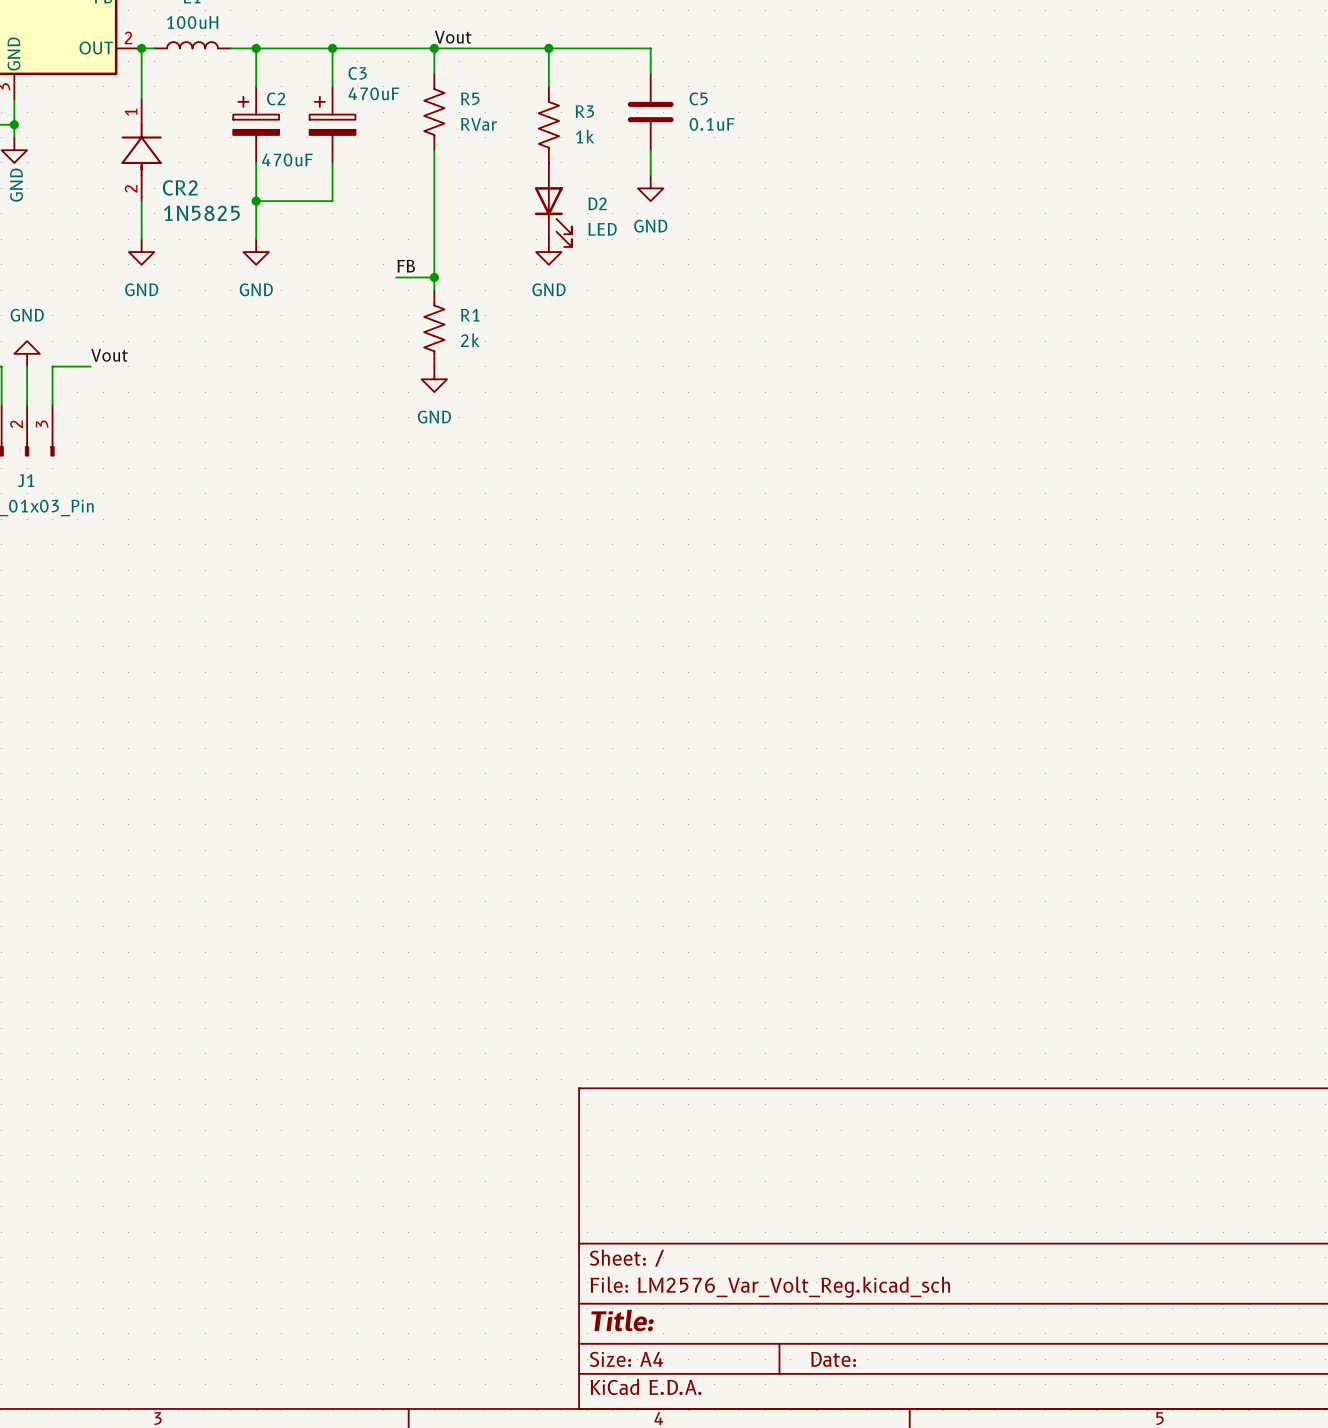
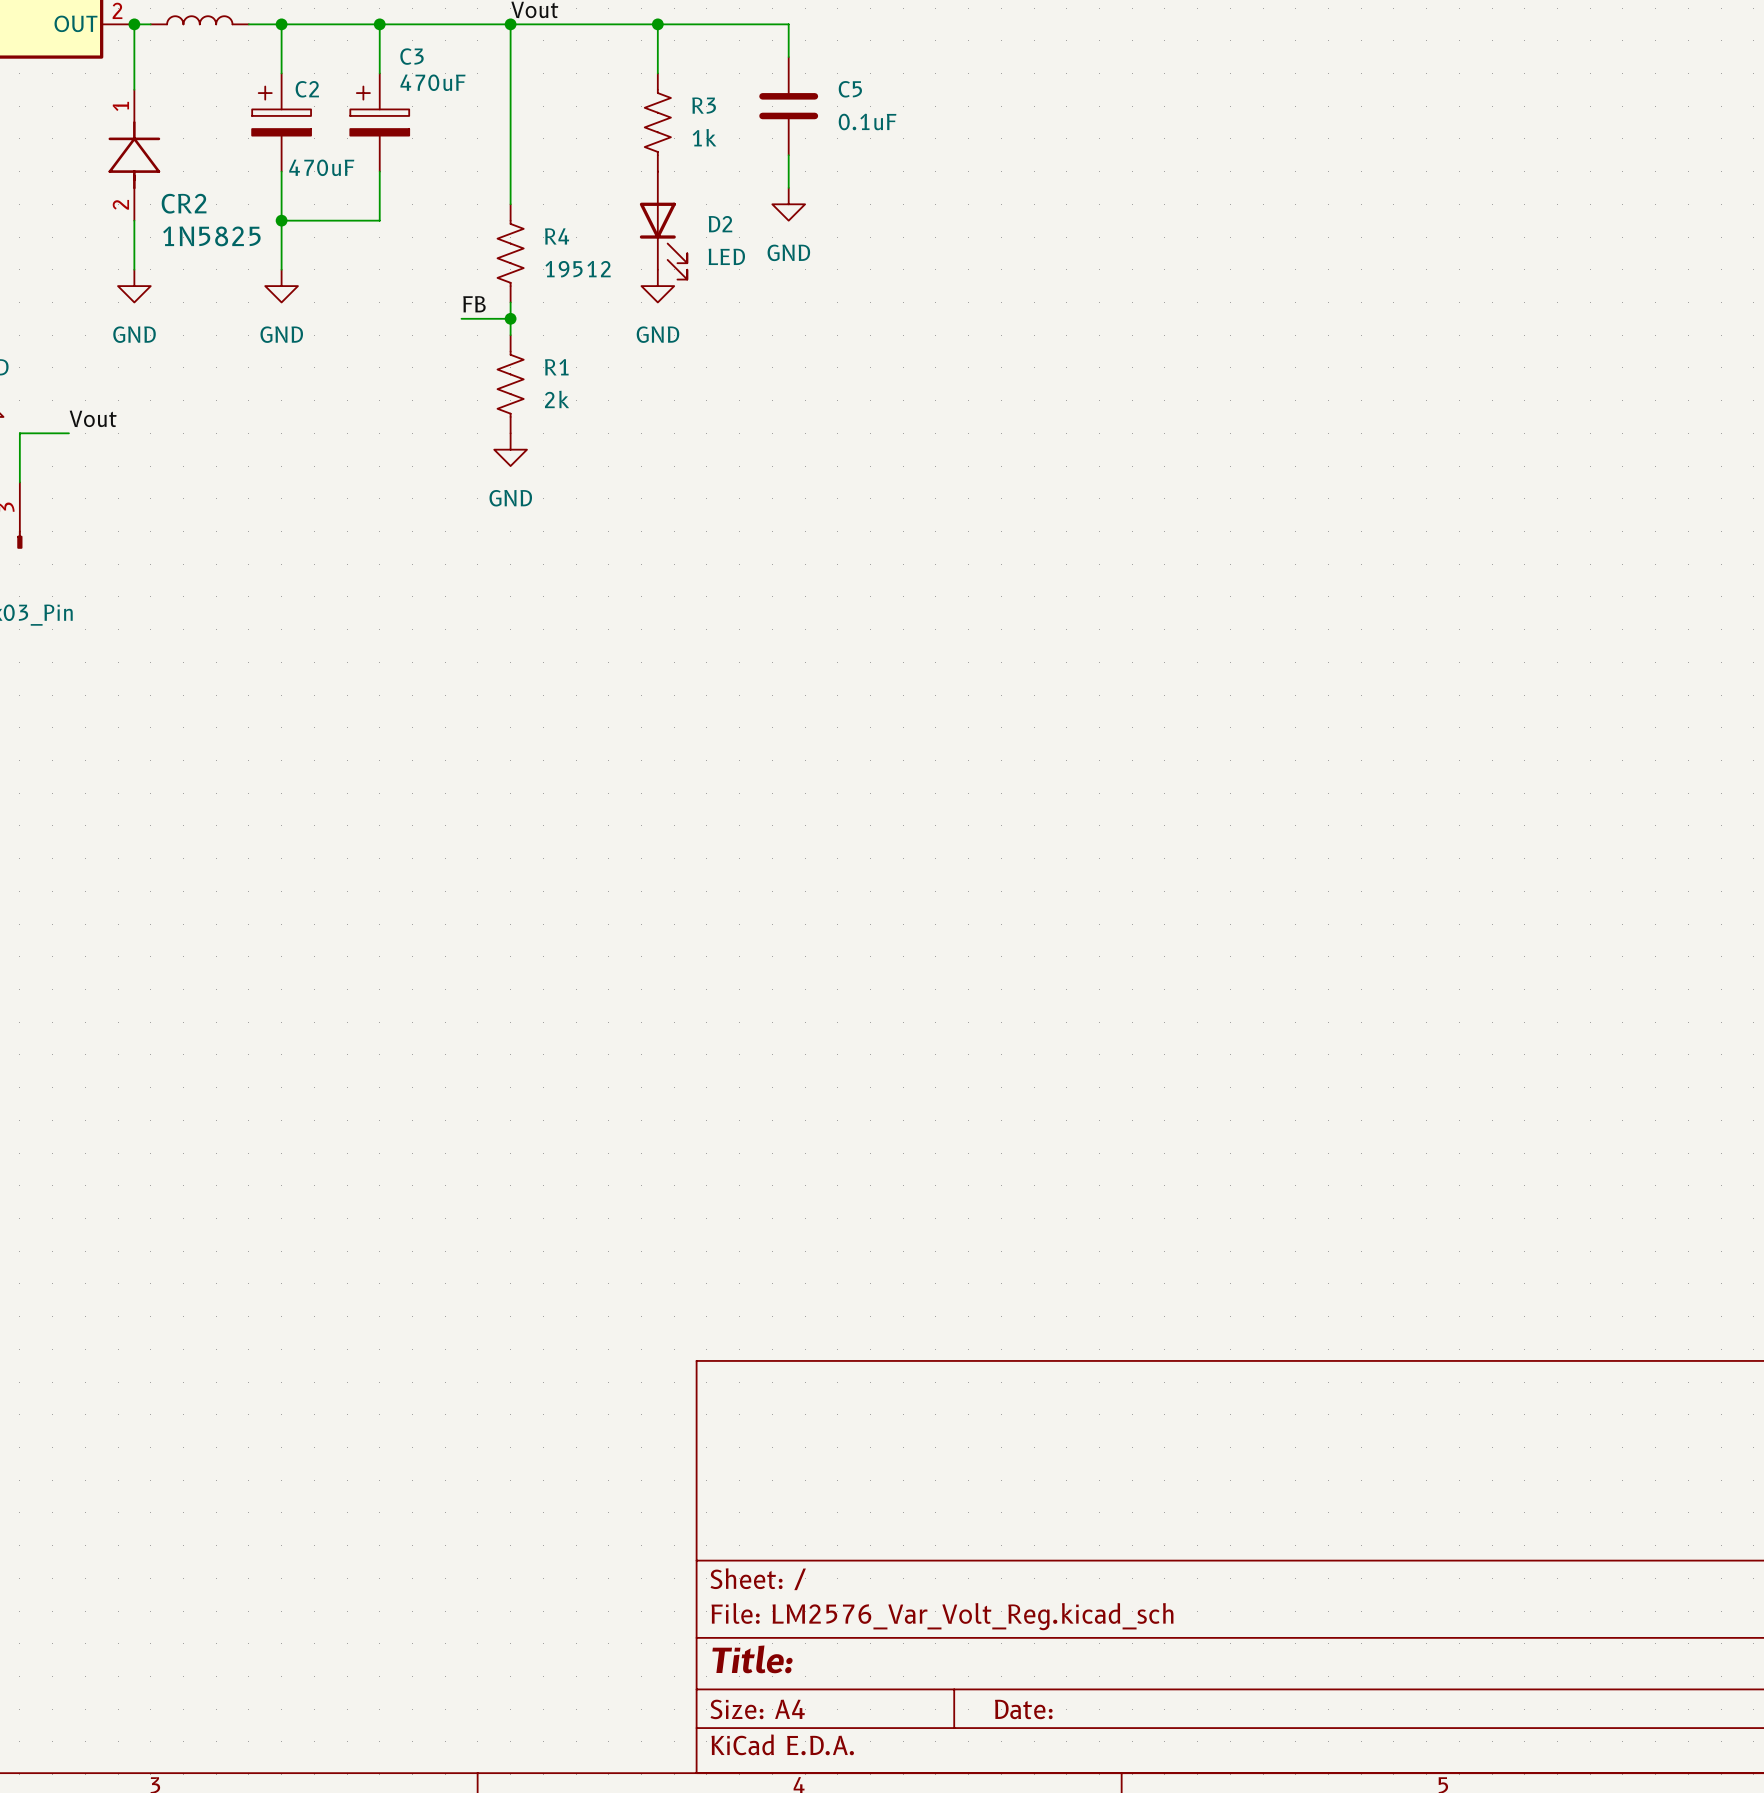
R5: RVar (434, 112) -> none
R4: none -> 19512 (510, 253)

